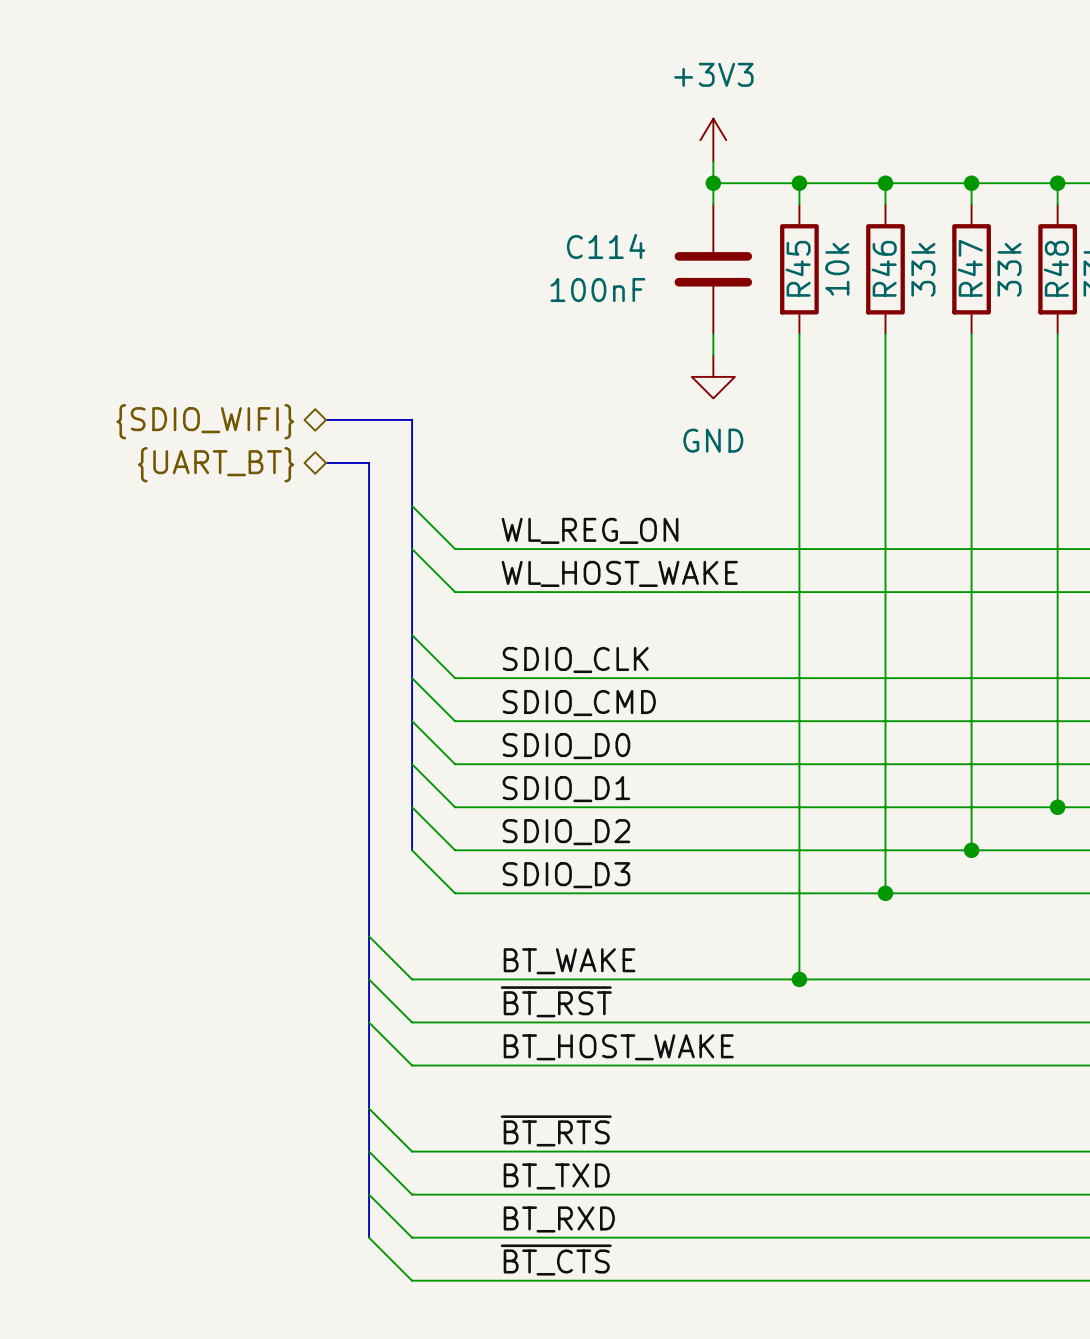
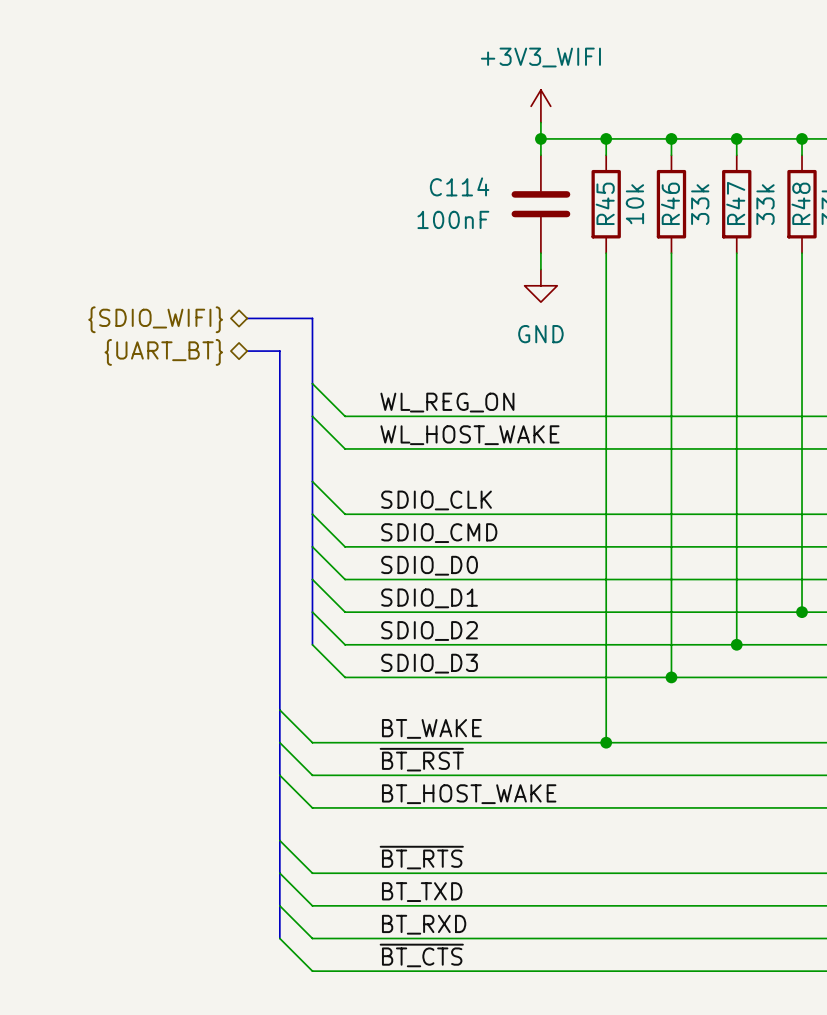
power symbol: +3V3 (713, 140) -> +3V3_WIFI (540, 106)

